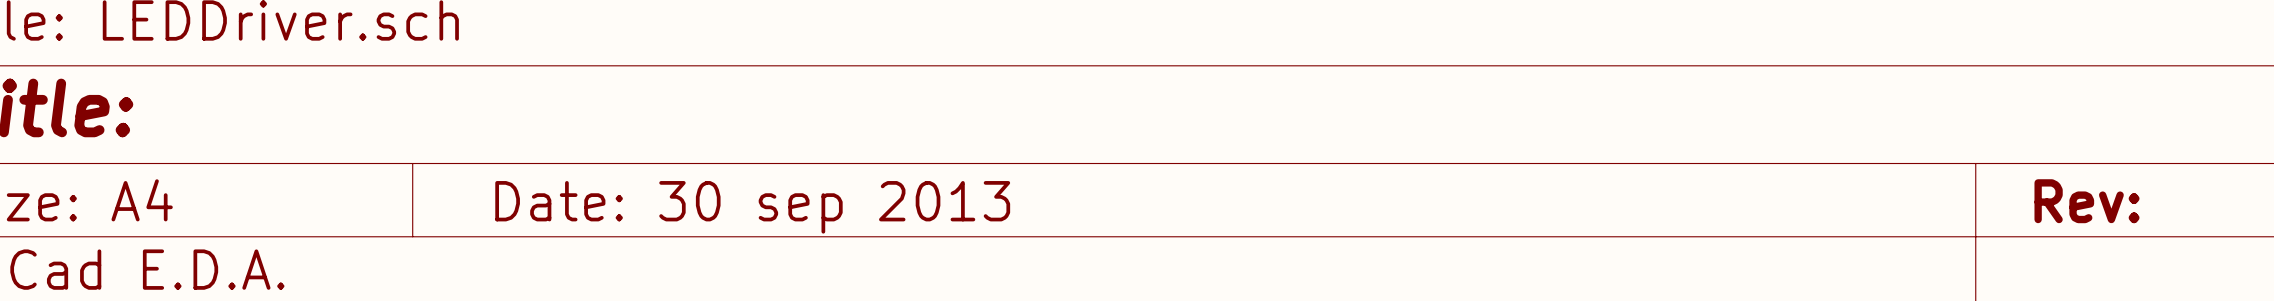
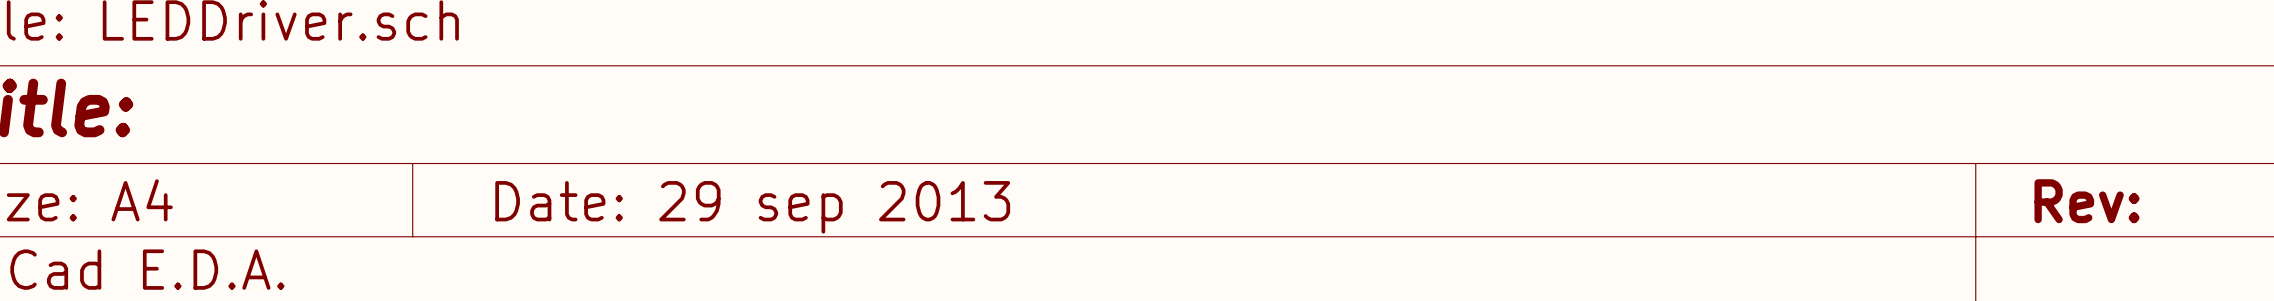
title block: Date: 30 sep 2013 (752, 207) -> Date: 29 sep 2013 (752, 207)

